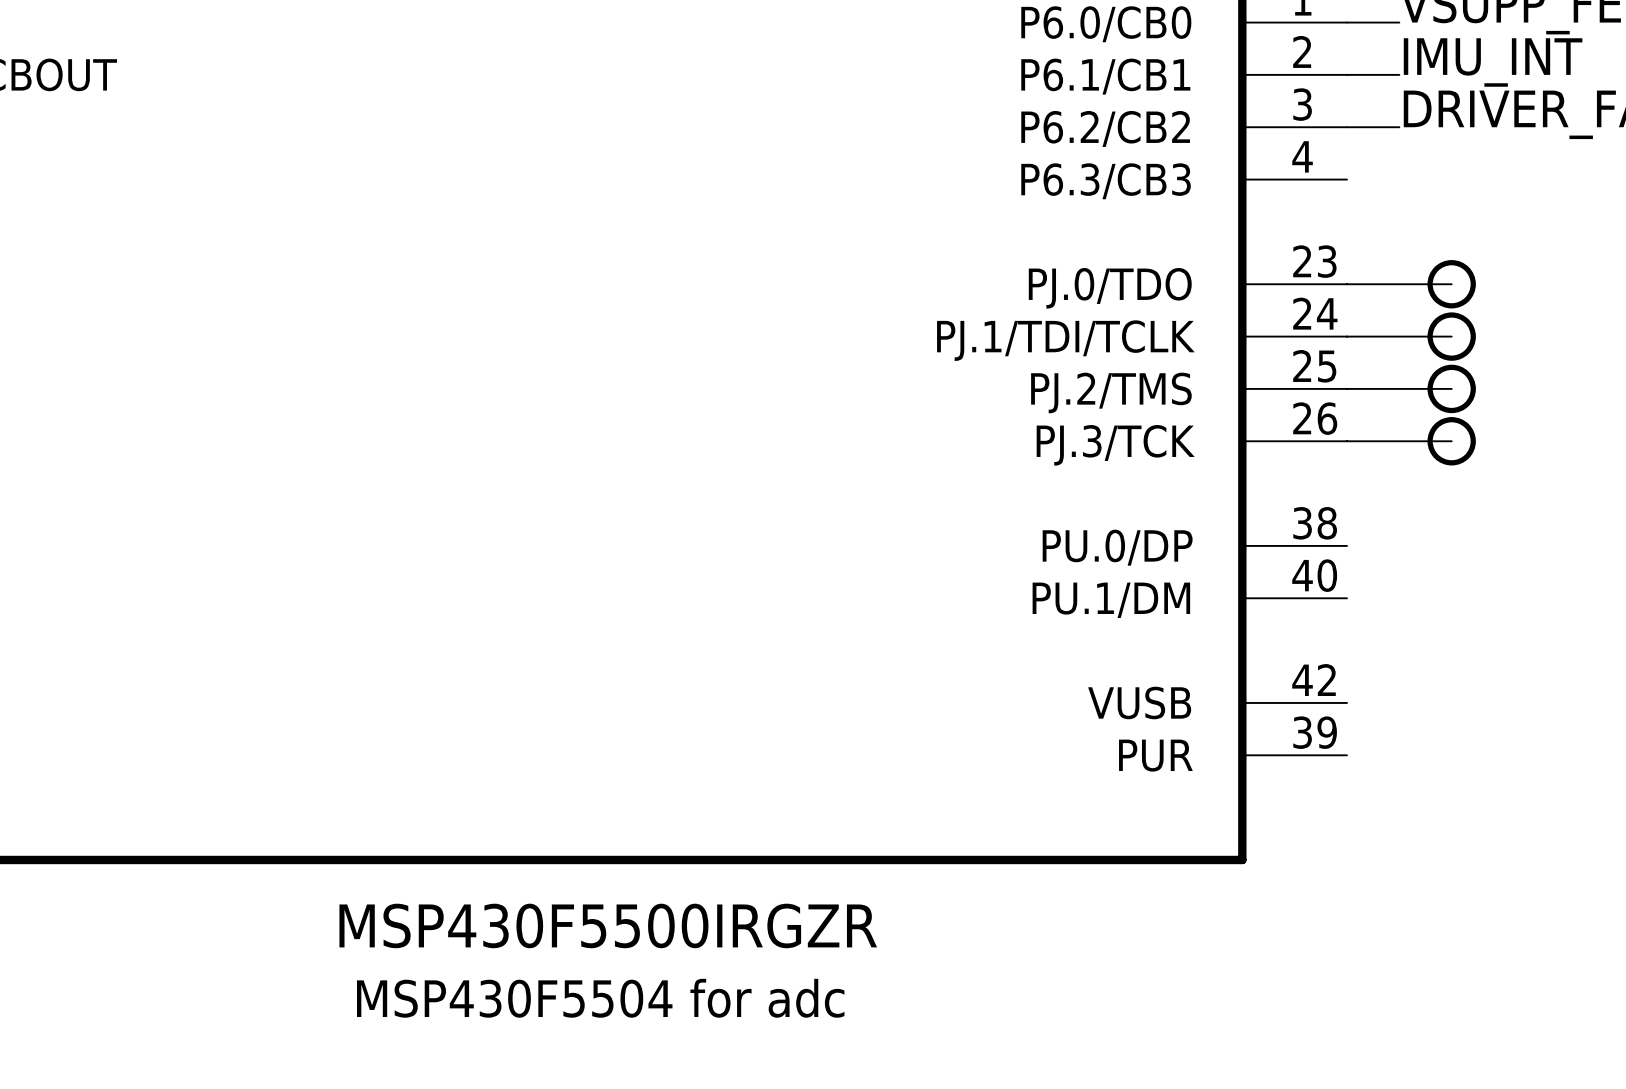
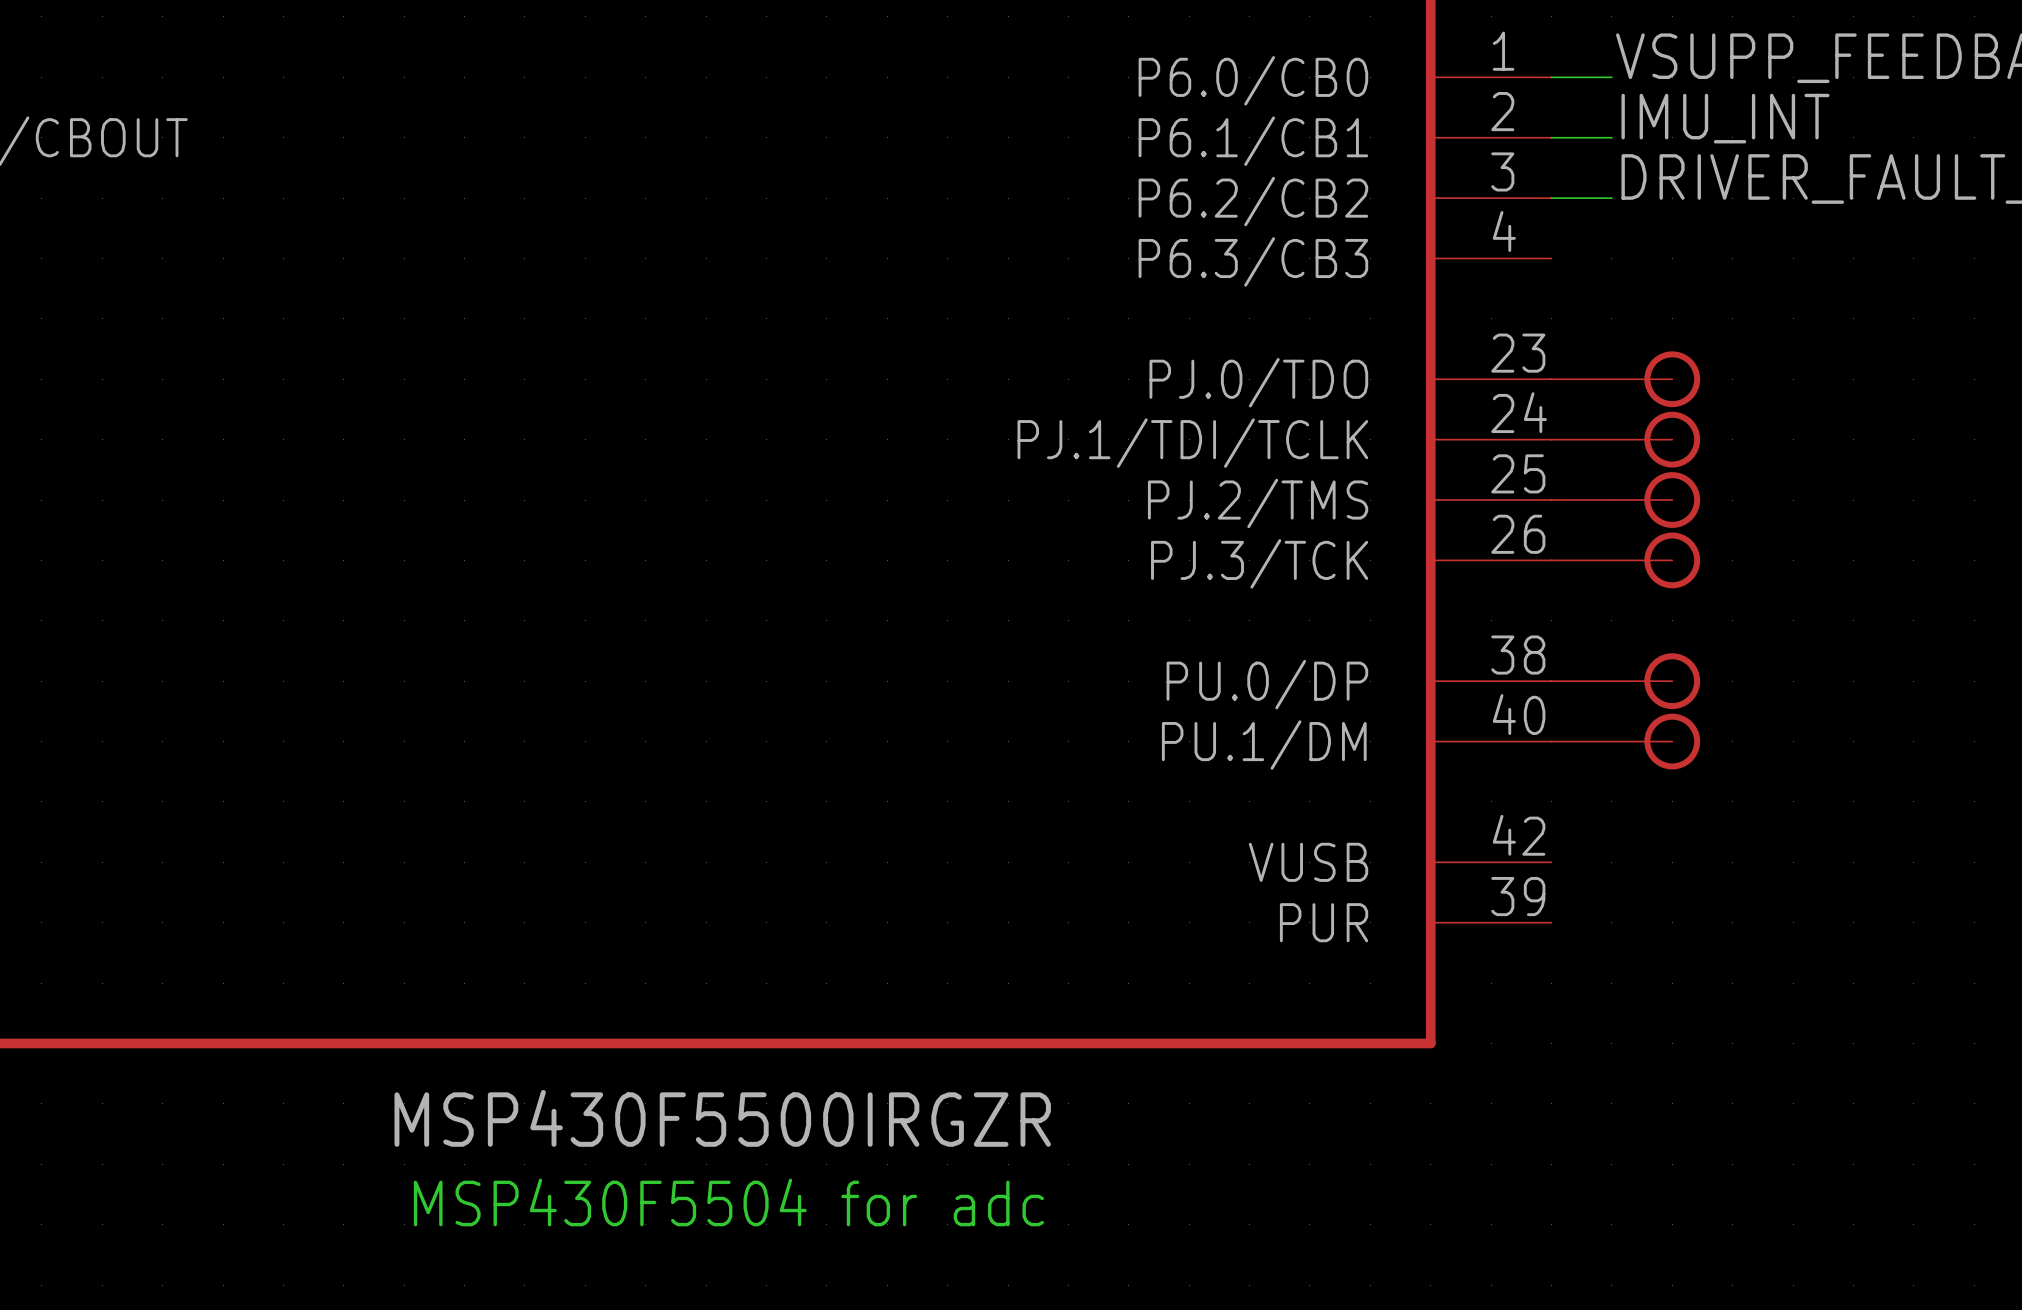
part: none -> (1625, 681)
part: none -> (1625, 741)

